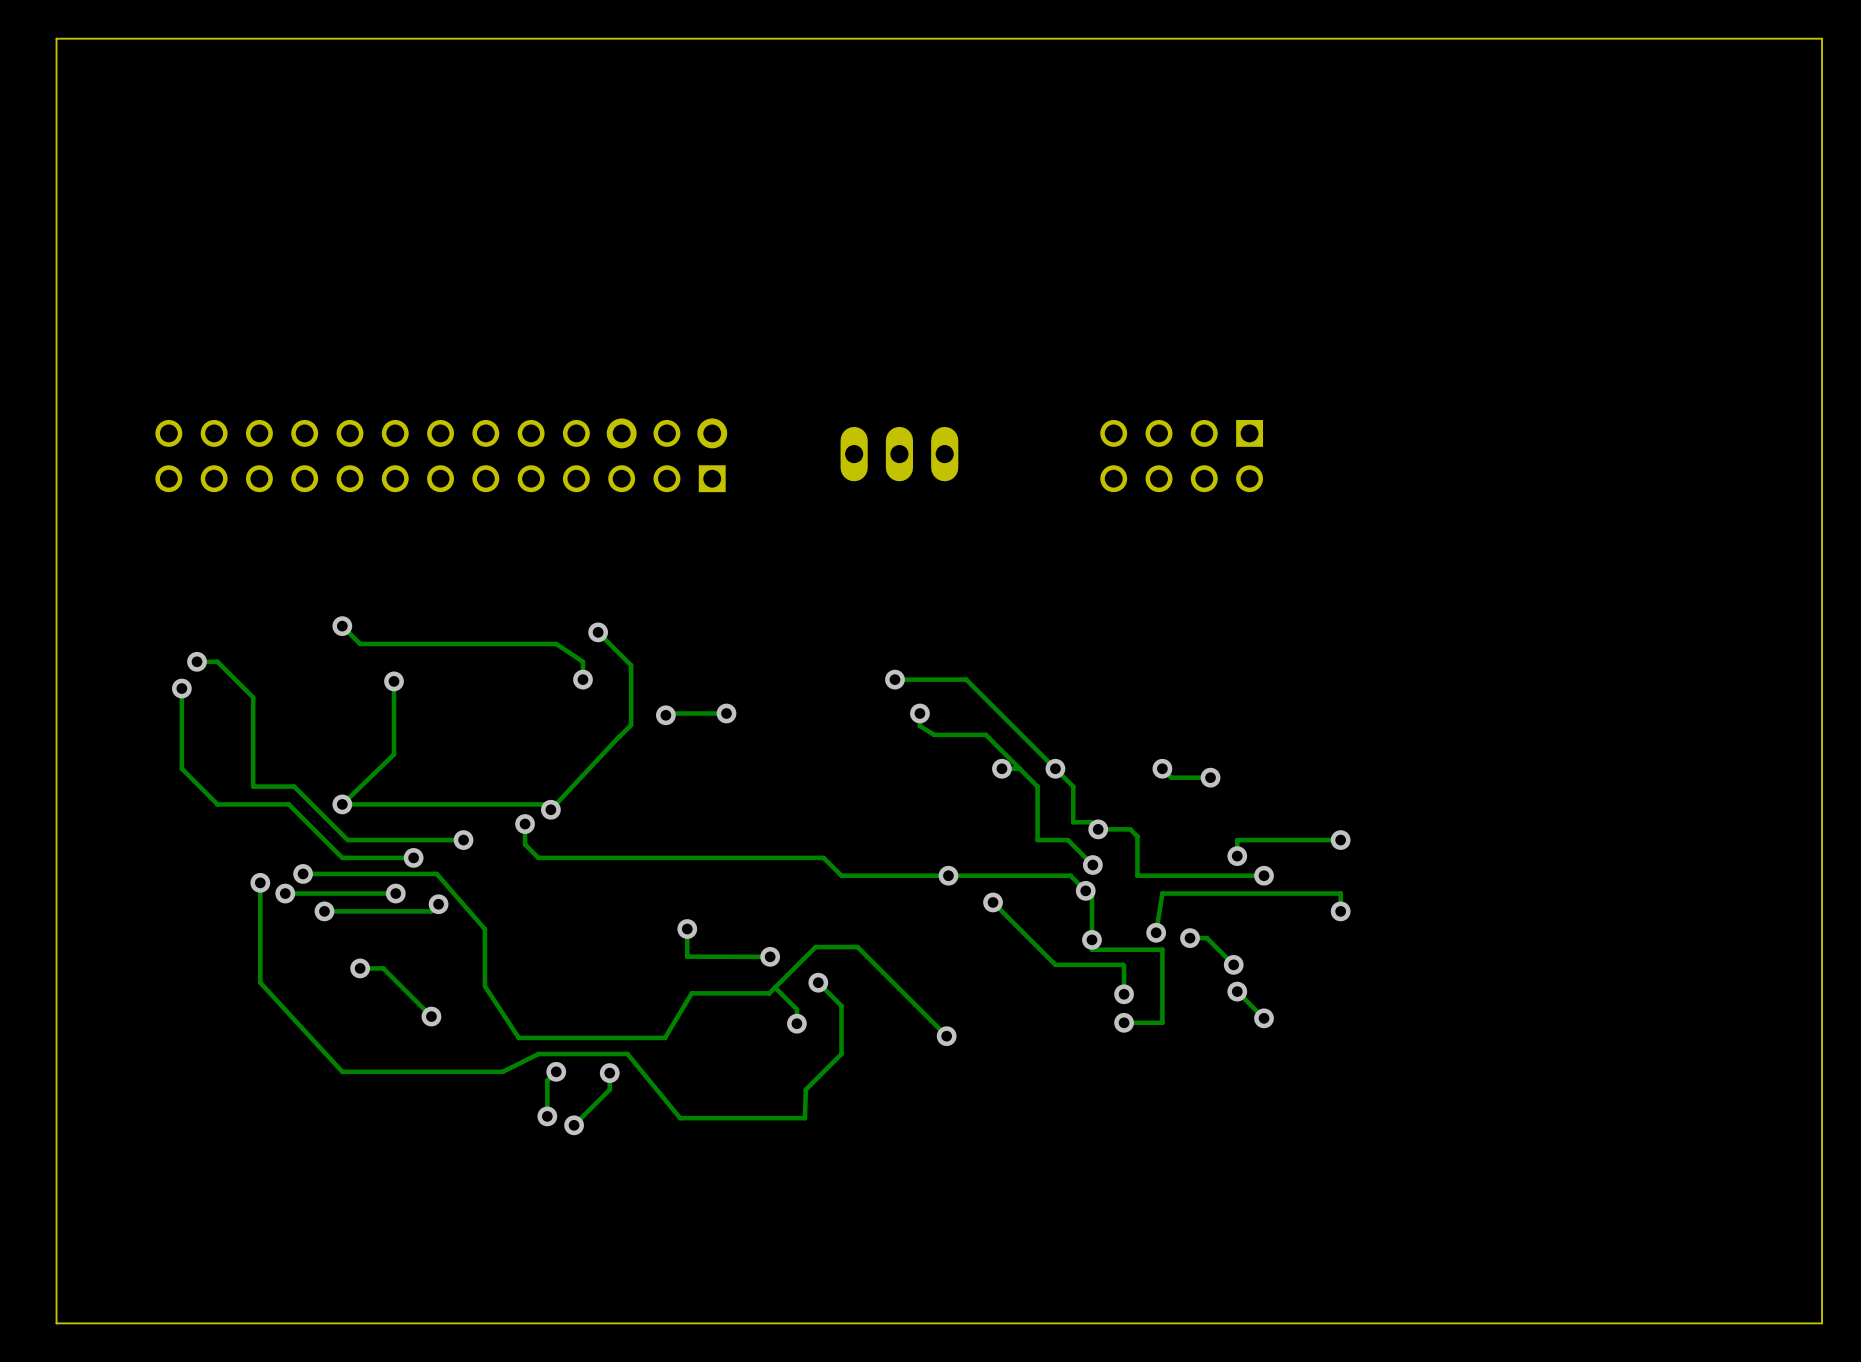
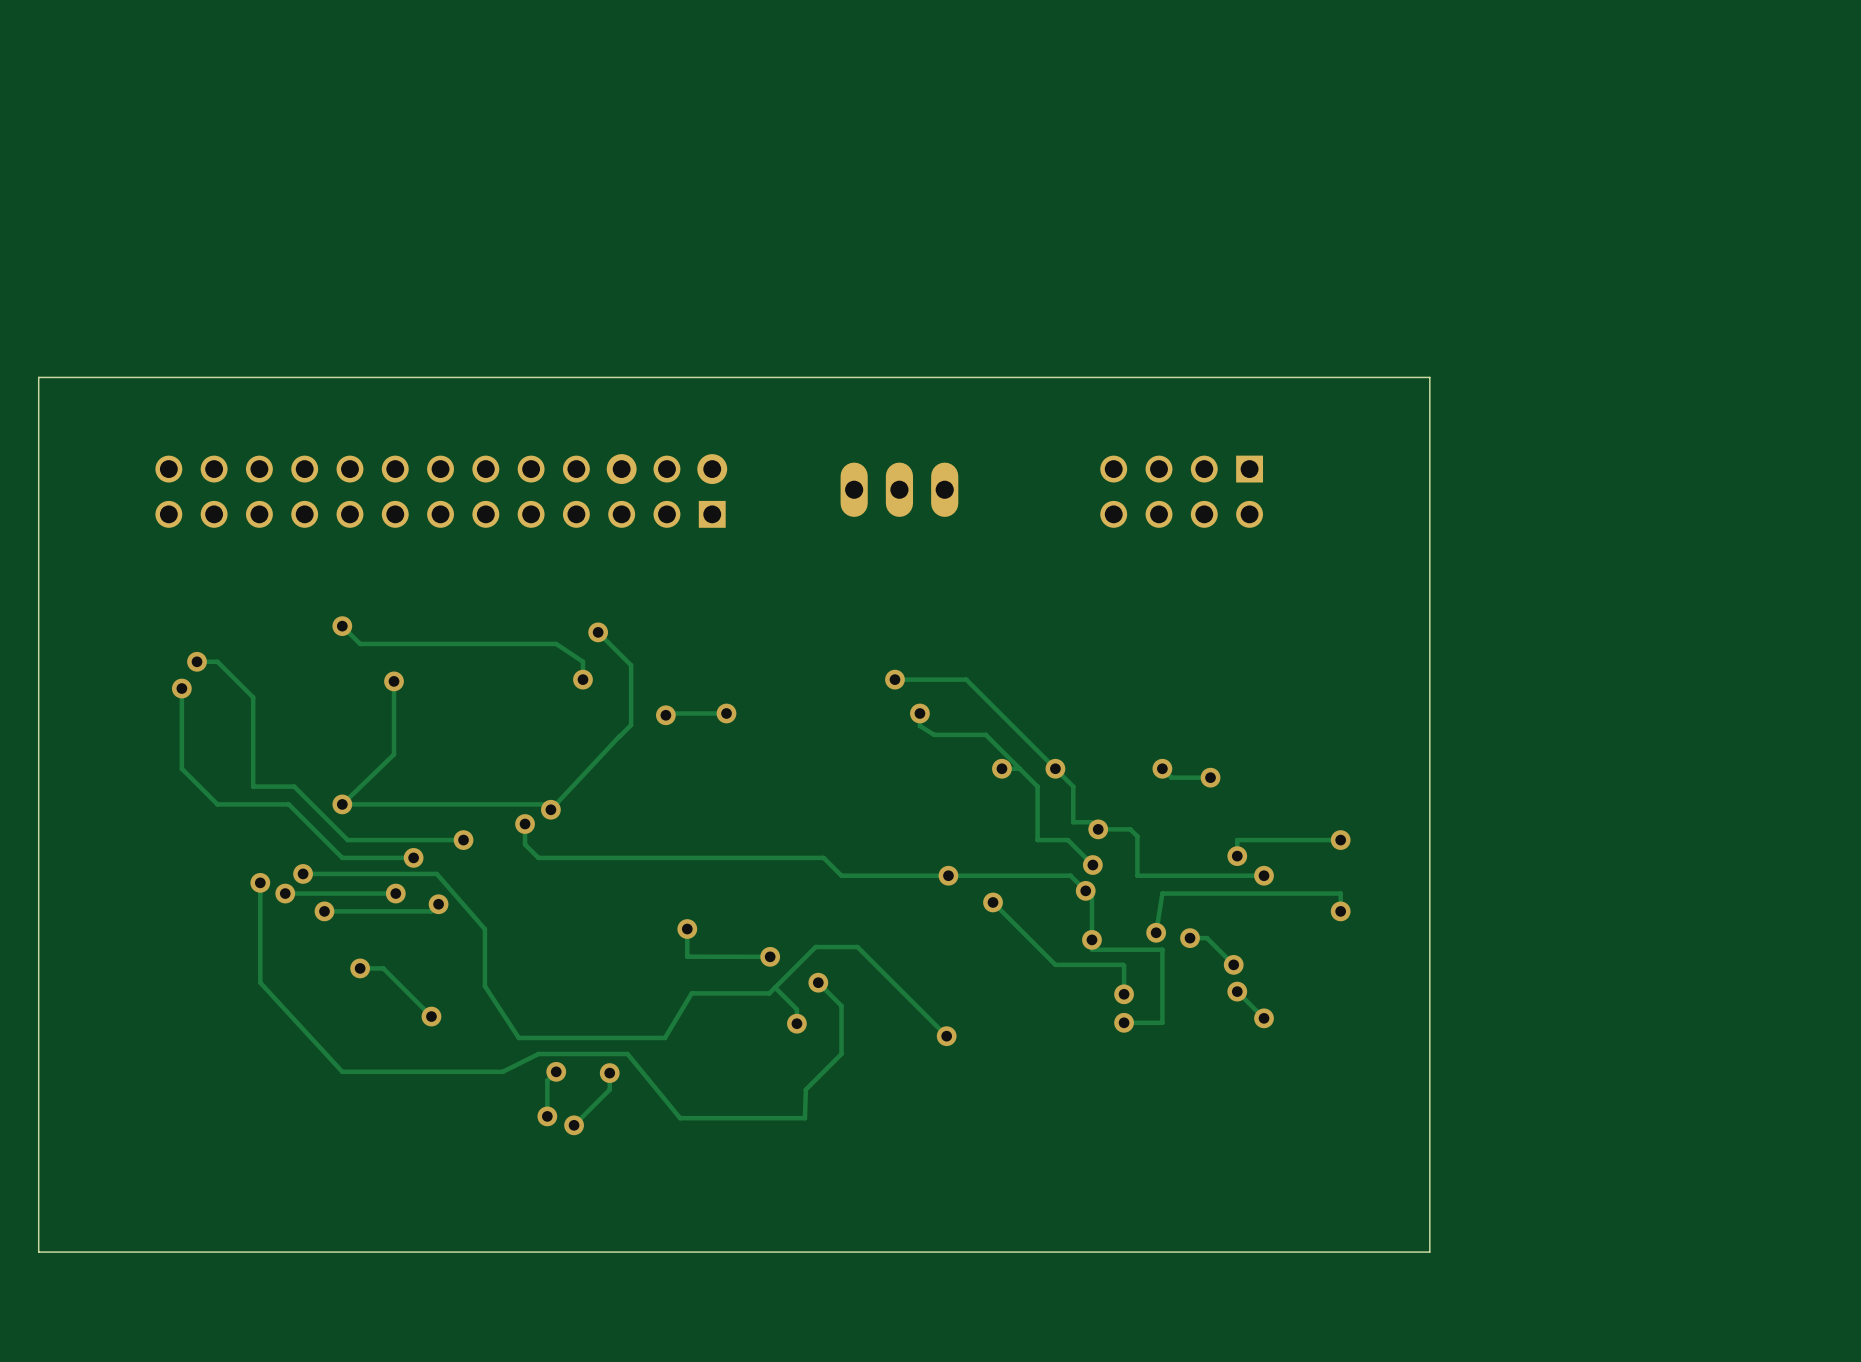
board edge: (1822, 38) (56, 38) (56, 1323) (1822, 1323) (1822, 38) -> (1429, 377) (1429, 1252) (38, 1252) (38, 377) (1429, 377)
part position: (899, 454) -> (899, 489)
part position: (441, 455) -> (441, 490)
part position: (1181, 456) -> (1181, 491)

